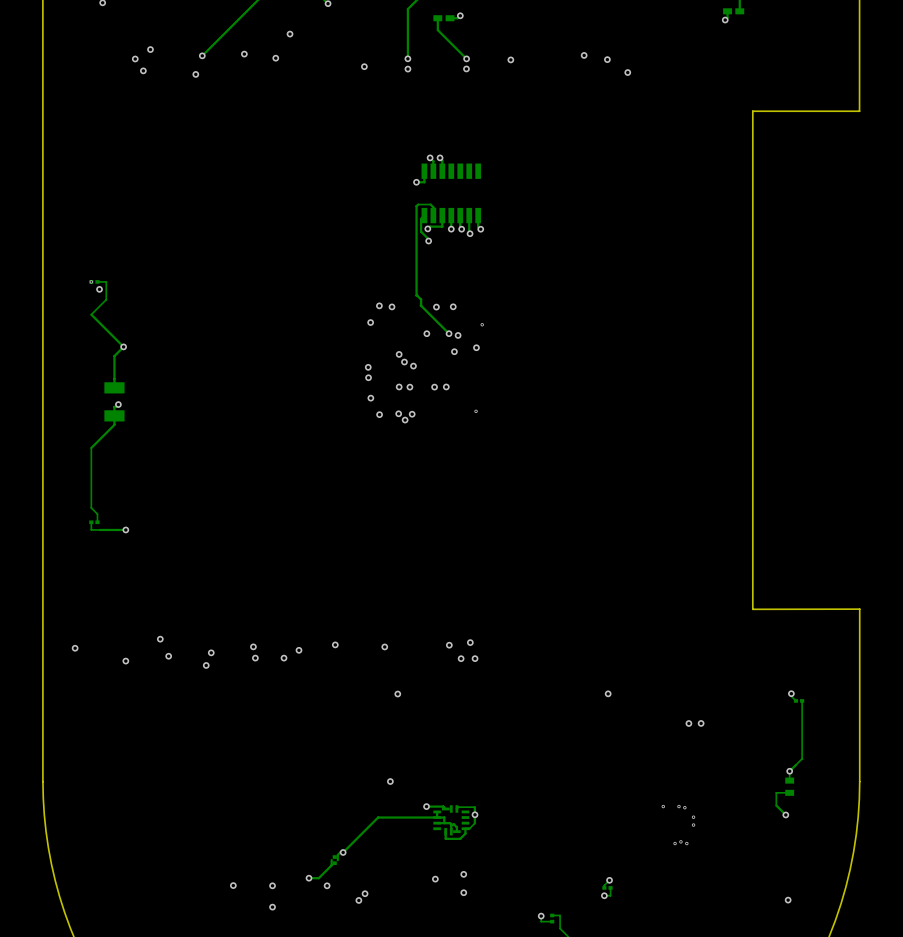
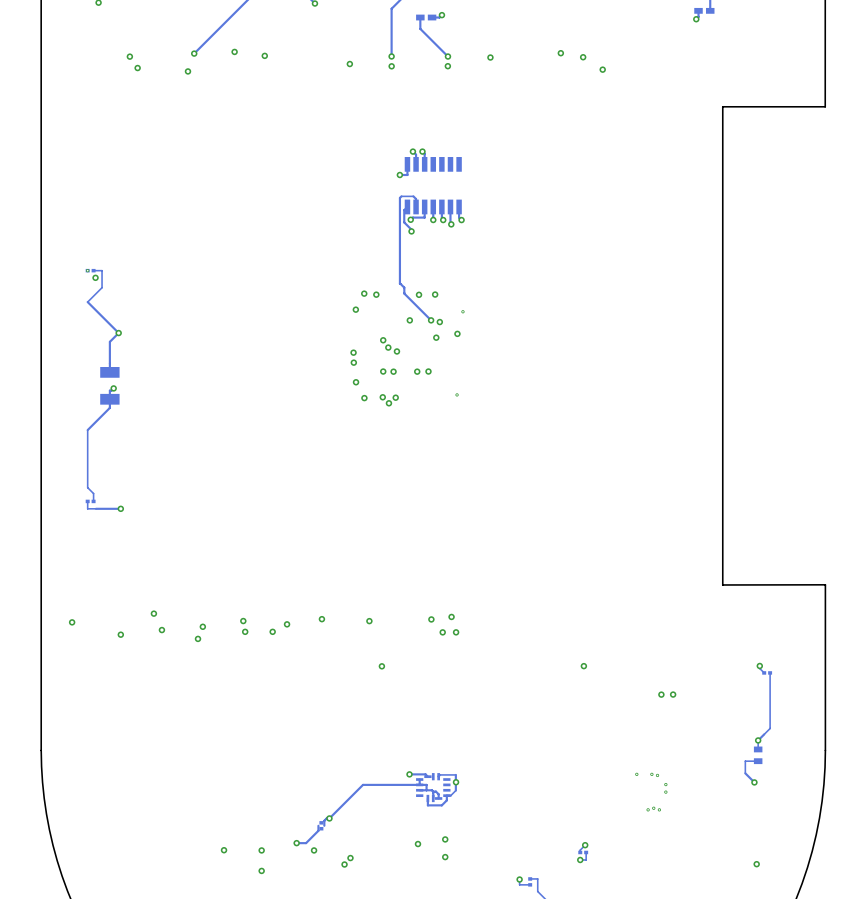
via: (290, 34) -> none
via: (150, 49) -> none
via: (390, 781) -> none

